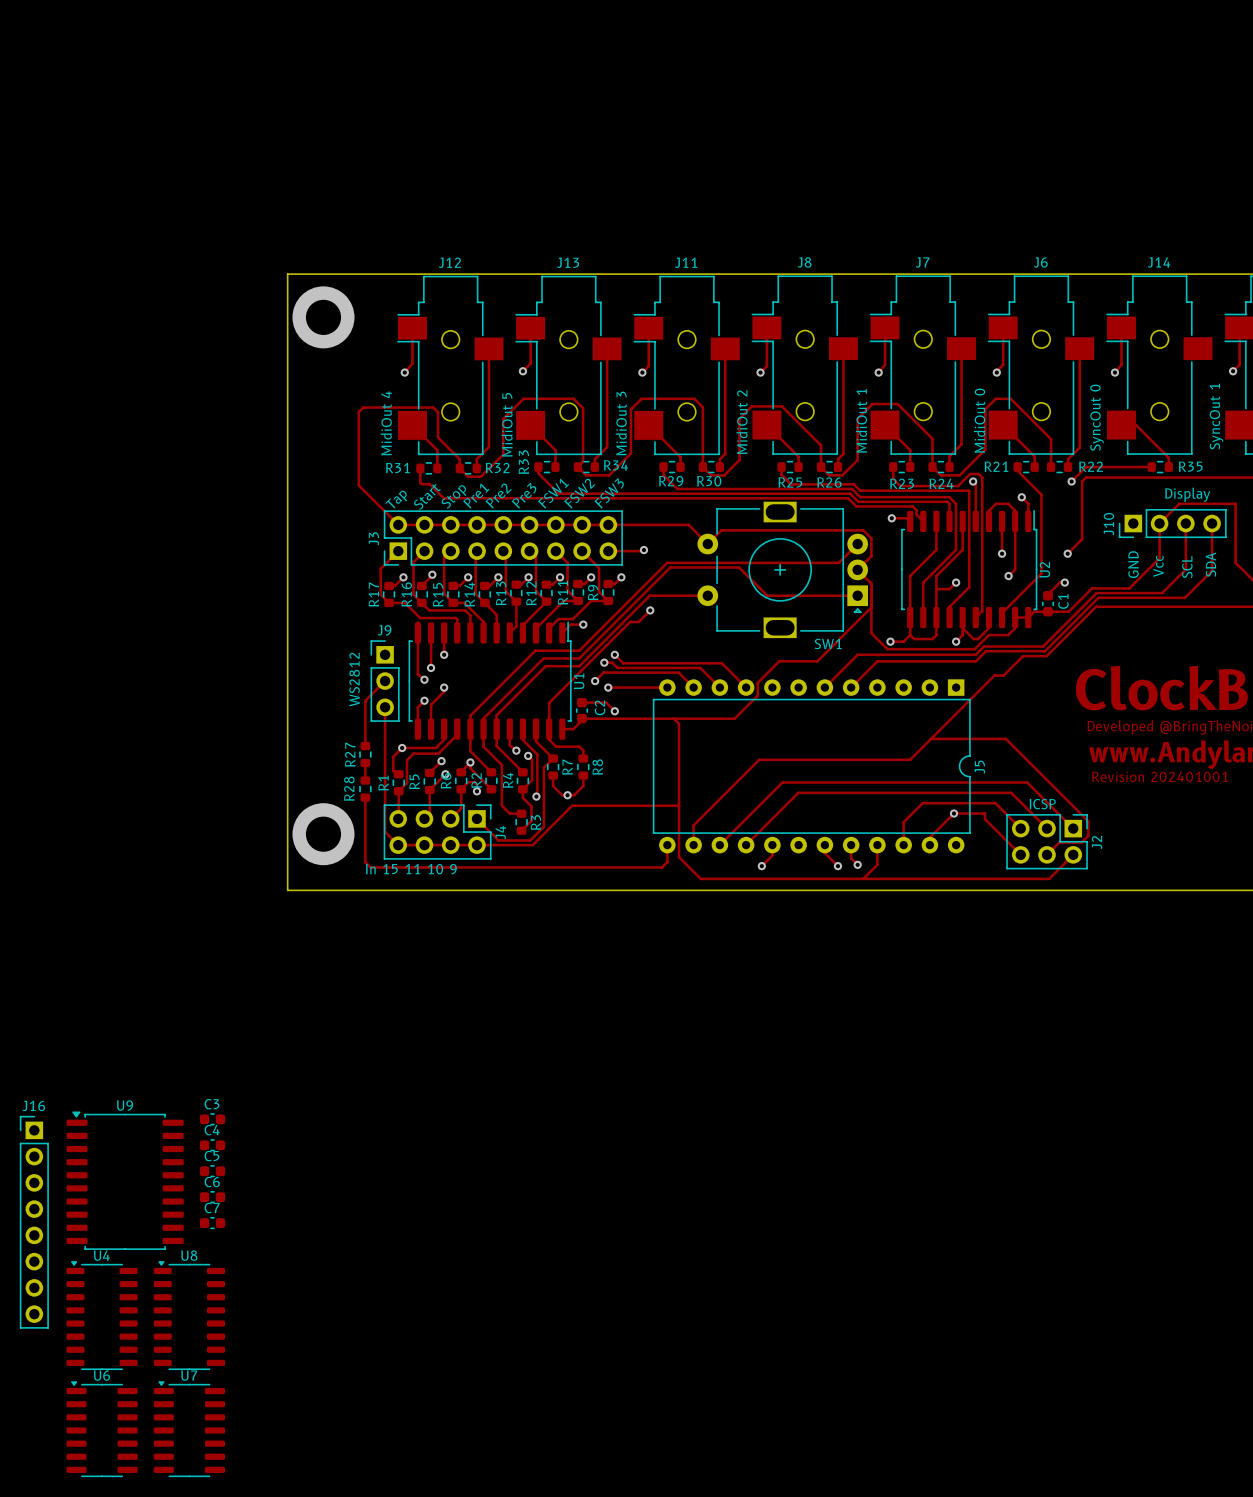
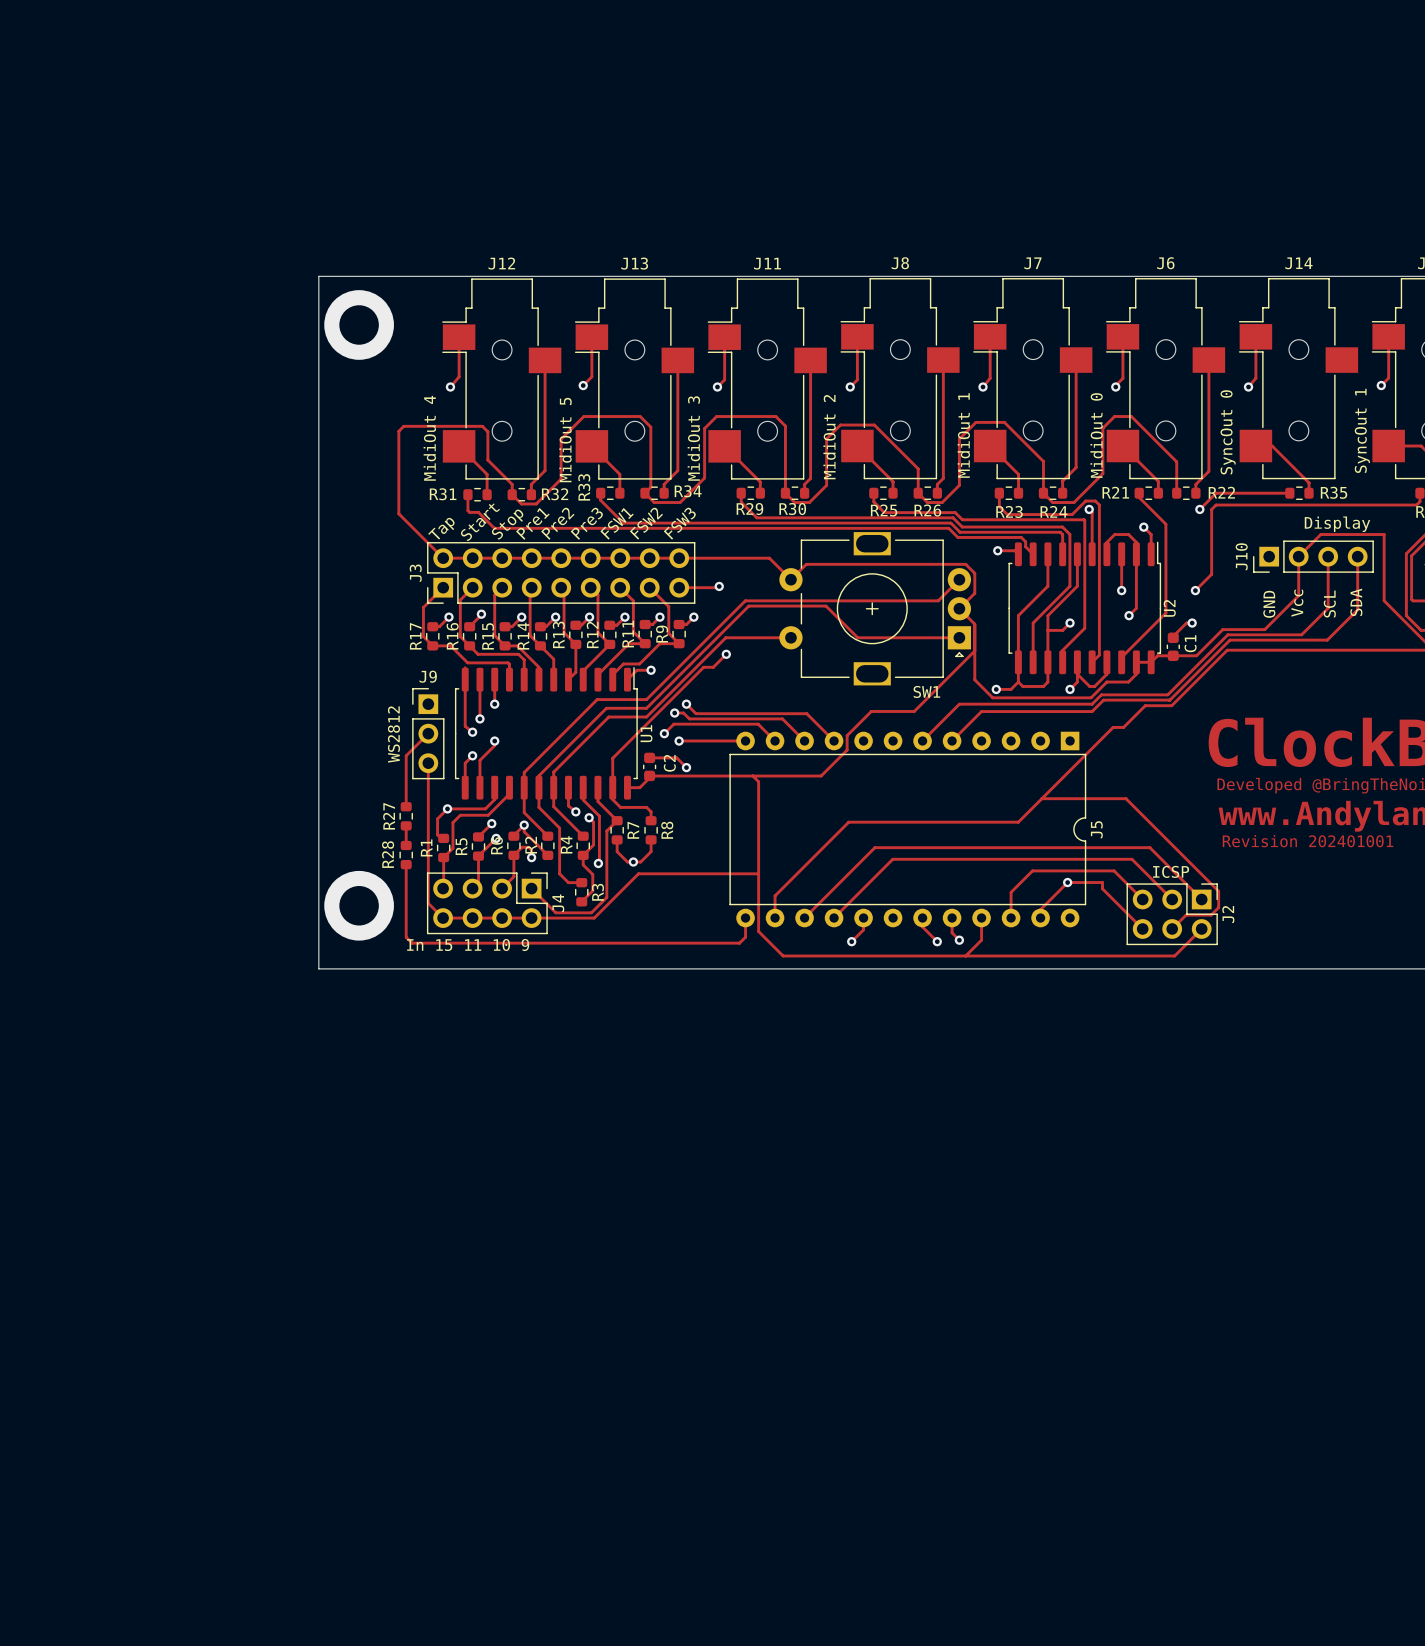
C3: (212, 1119) -> none
C4: (212, 1145) -> none
C5: (212, 1171) -> none
U9: (125, 1180) -> none
C6: (212, 1197) -> none
J16: (34, 1222) -> none
C7: (212, 1223) -> none
U4: (102, 1315) -> none
U8: (189, 1315) -> none
U6: (102, 1429) -> none
U7: (189, 1429) -> none

